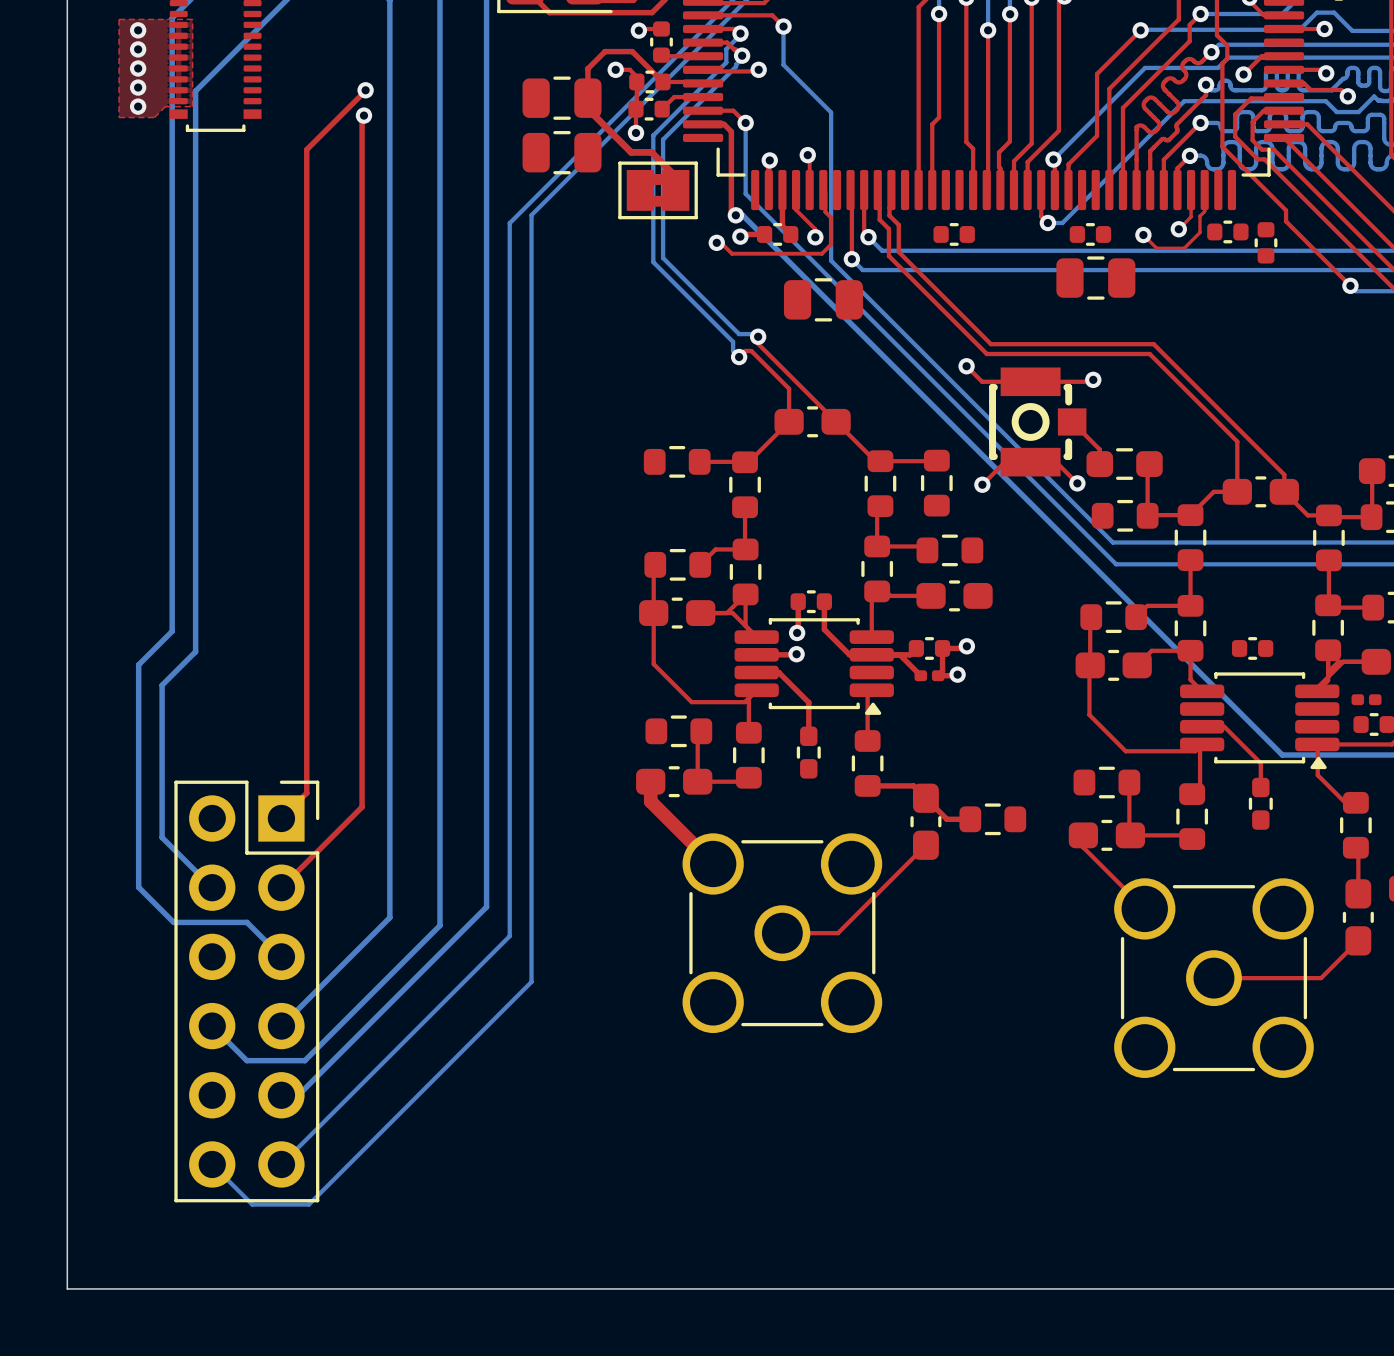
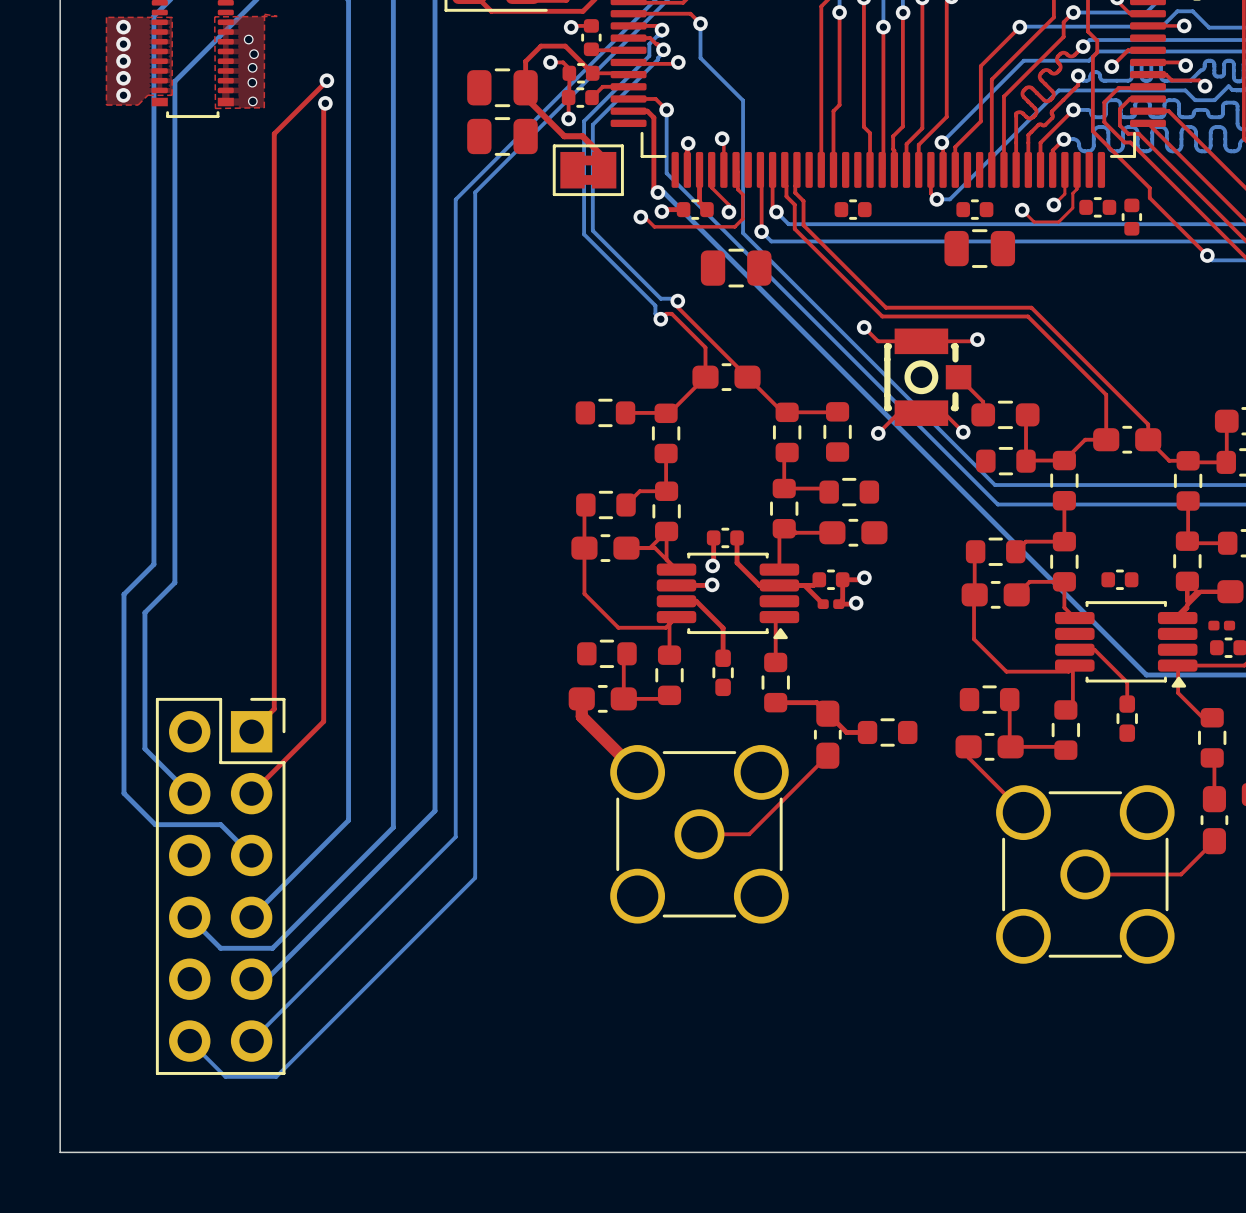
top zone outline: none -> (264, 14) (264, 107) (215, 108) (214, 16) (277, 16) (264, 14)
via: none -> (248, 39)
via: none -> (254, 54)
via: none -> (252, 67)
via: none -> (252, 82)
via: none -> (252, 101)

